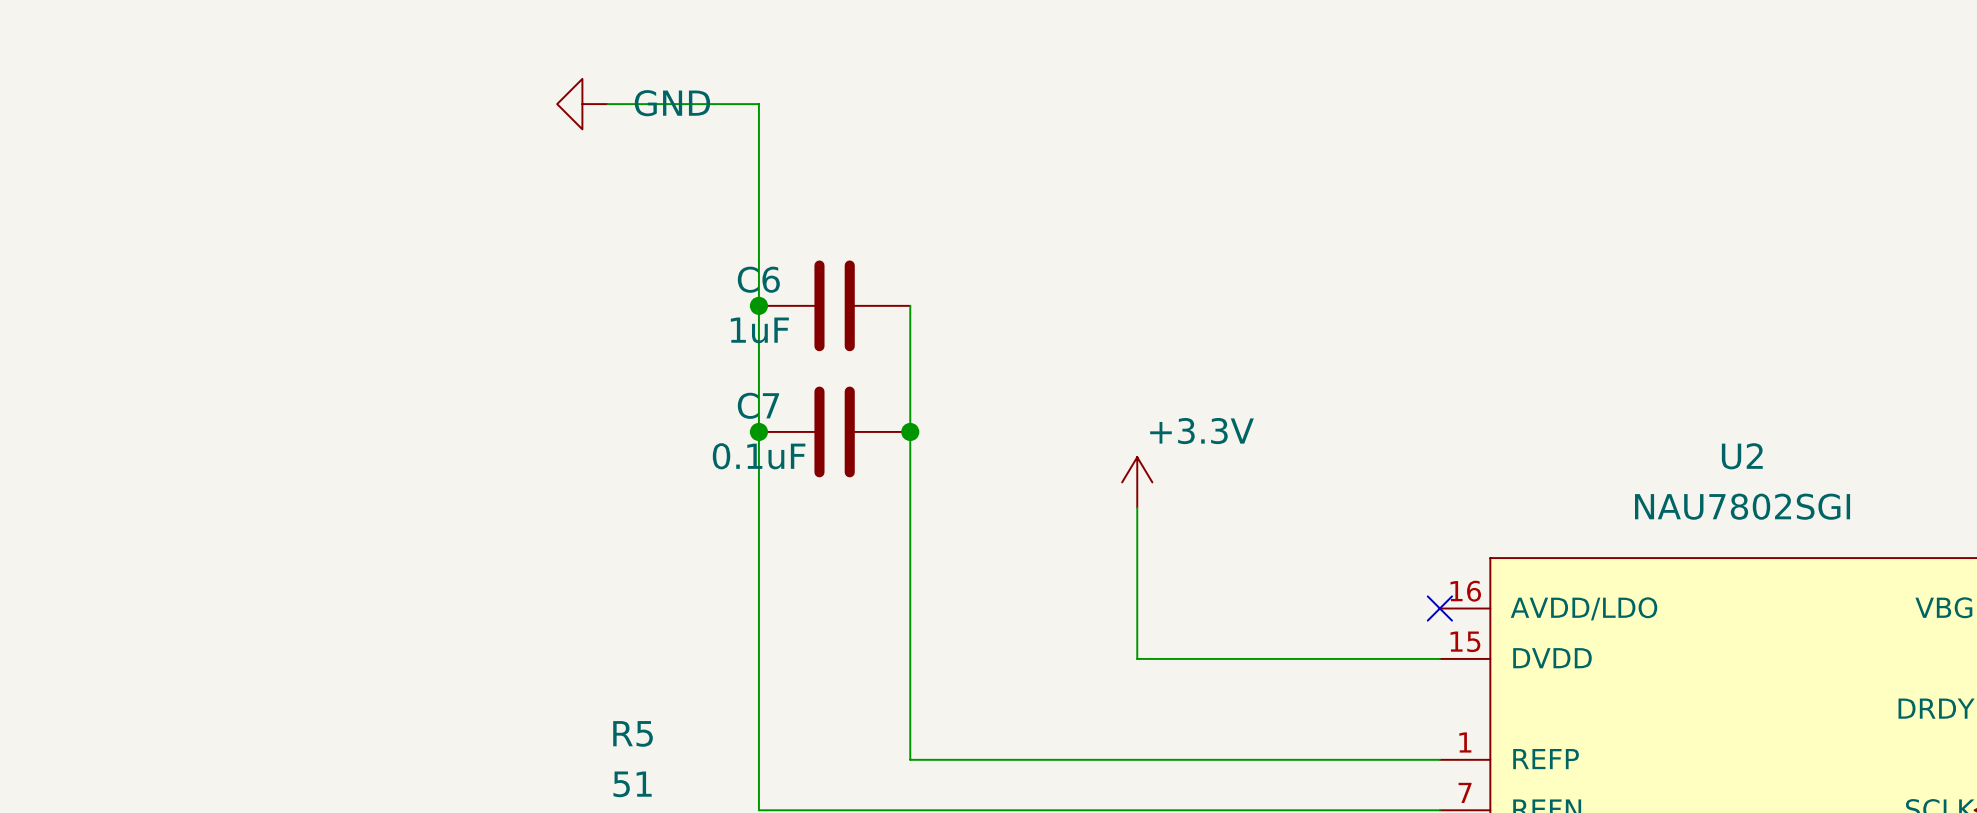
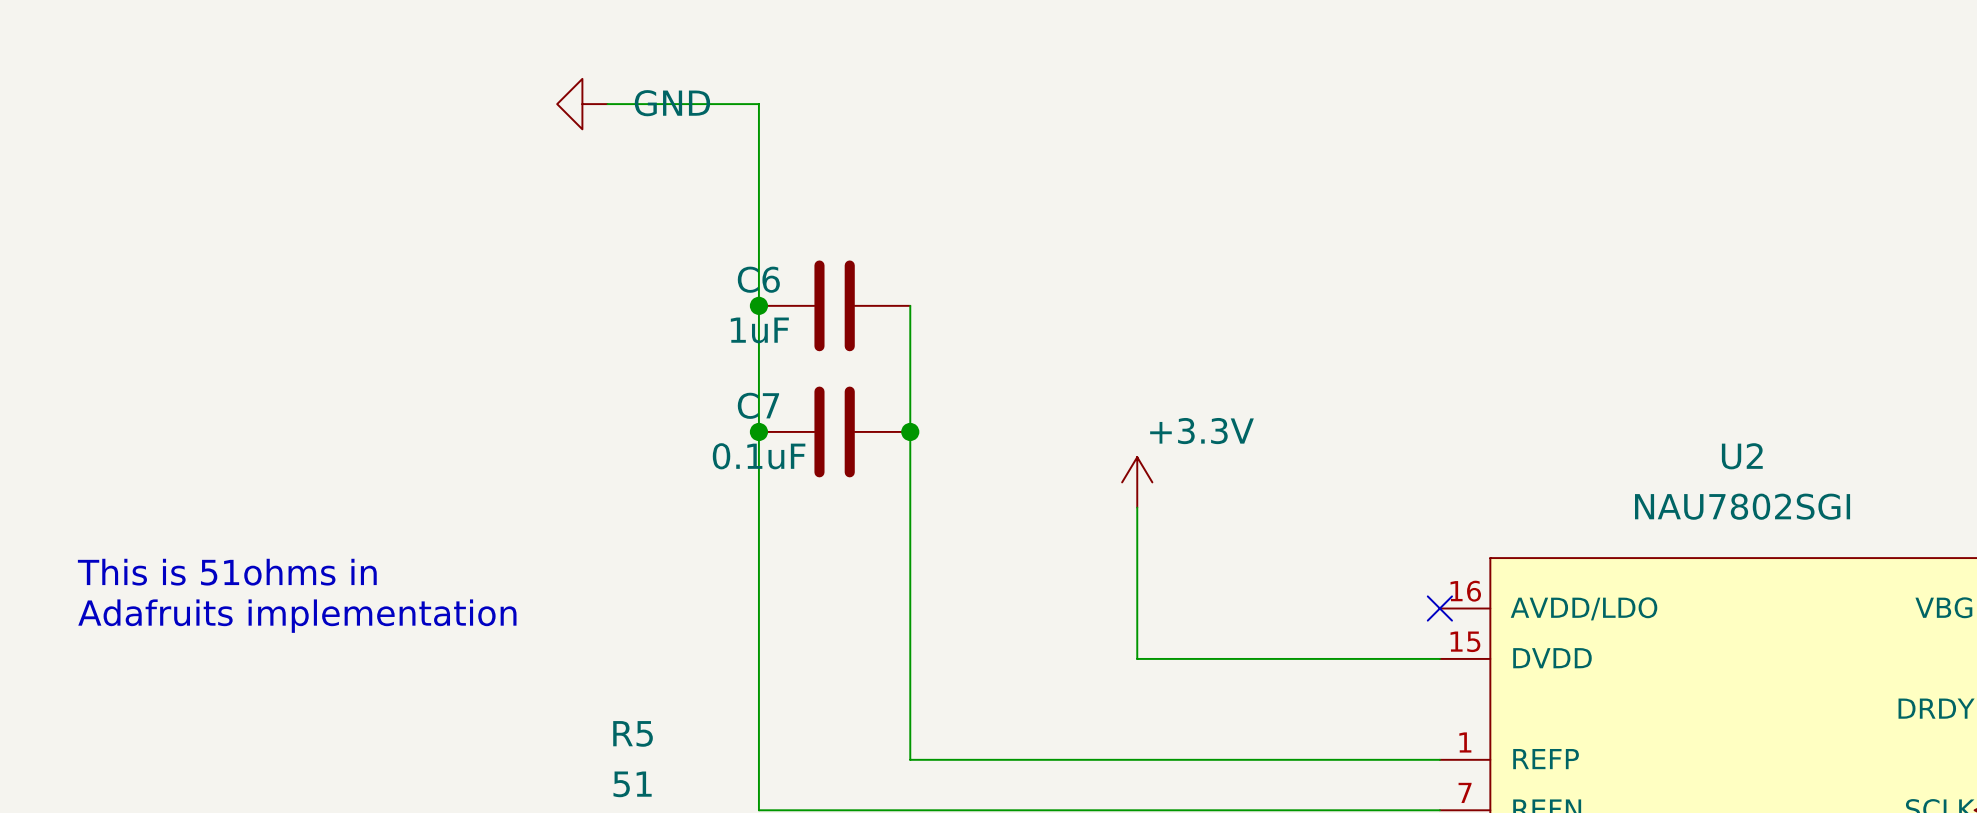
text: none -> This is 51ohms in (227, 572)
text: none -> Adafruits implementation (297, 616)

